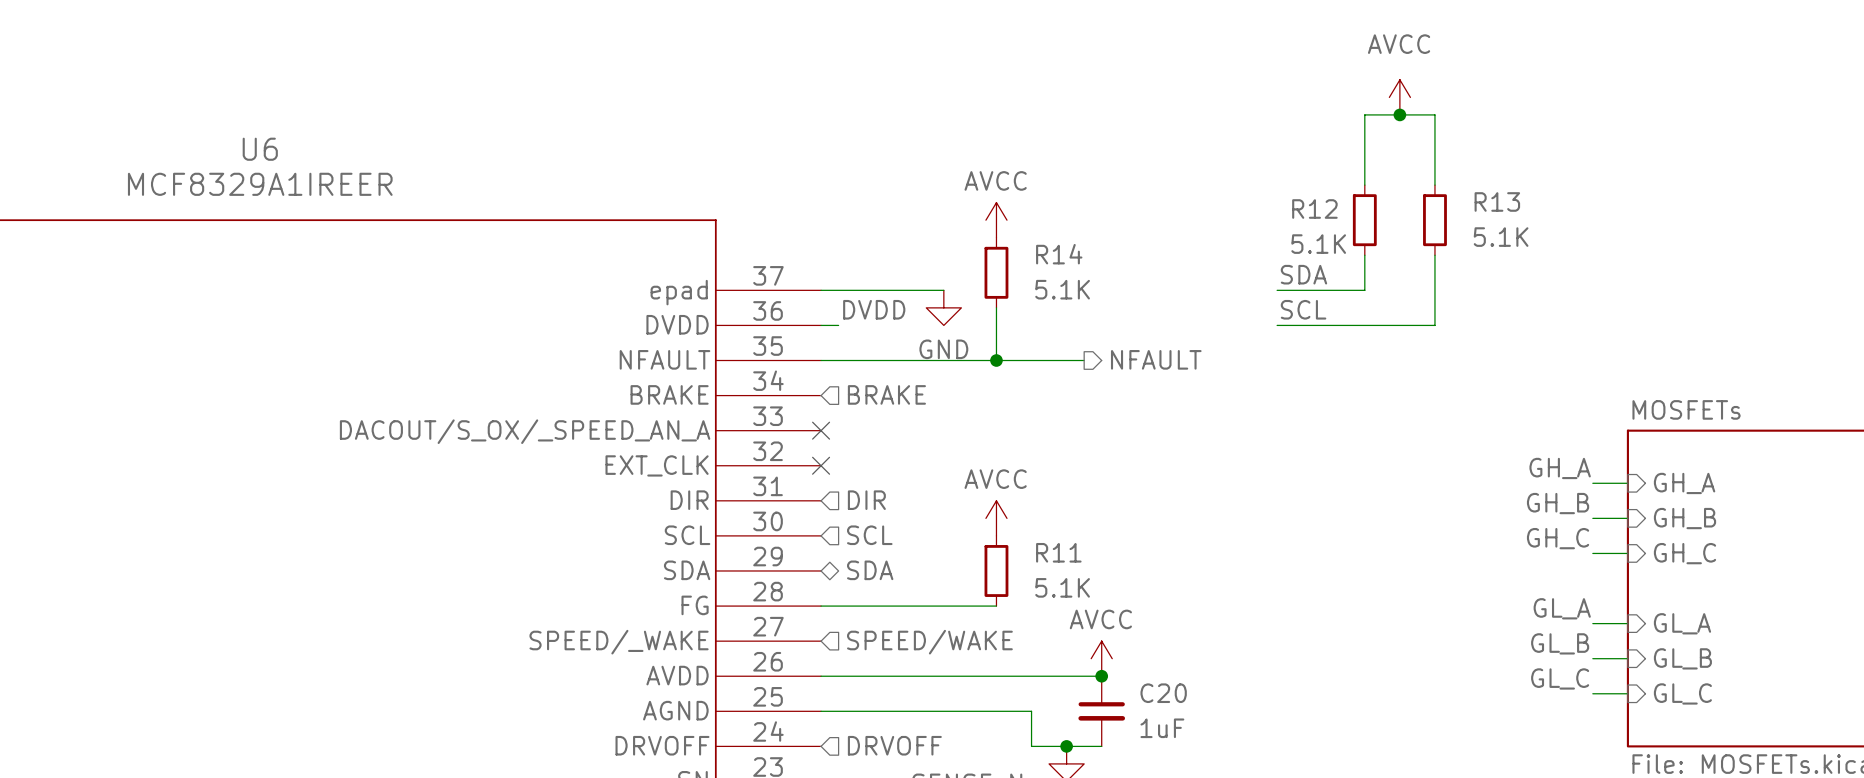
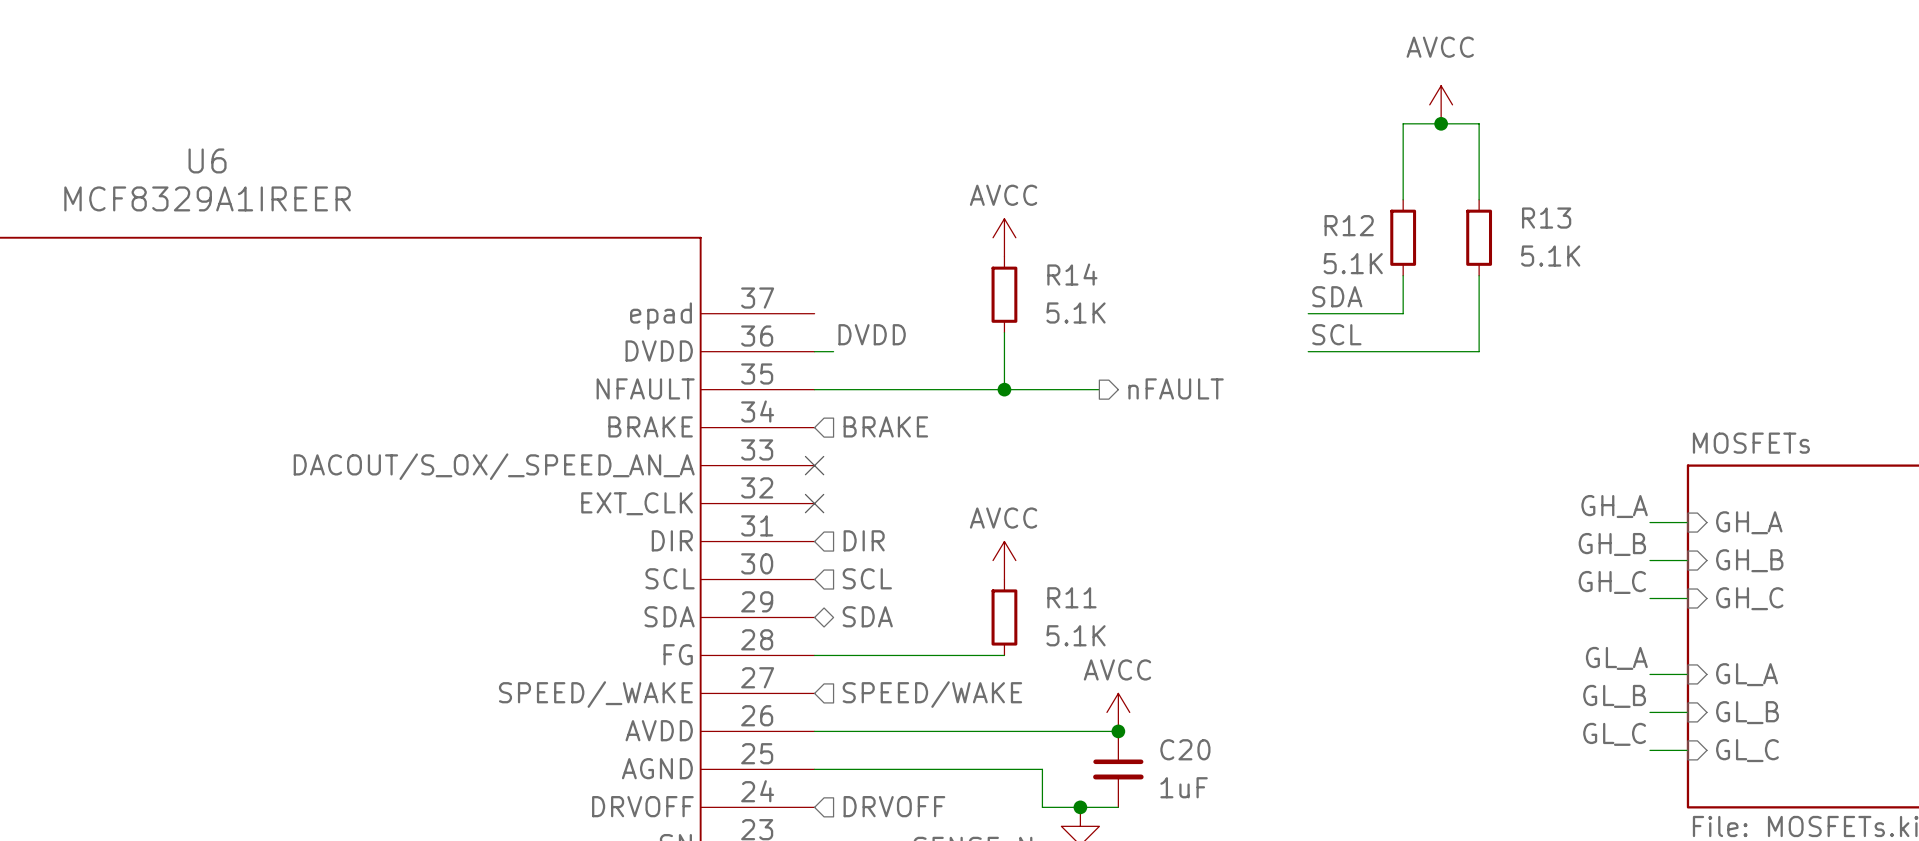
wire: (821, 290) (943, 290) -> none
power symbol: GND (943, 307) -> none
hierarchical label: NFAULT (1156, 359) -> nFAULT (1176, 388)

